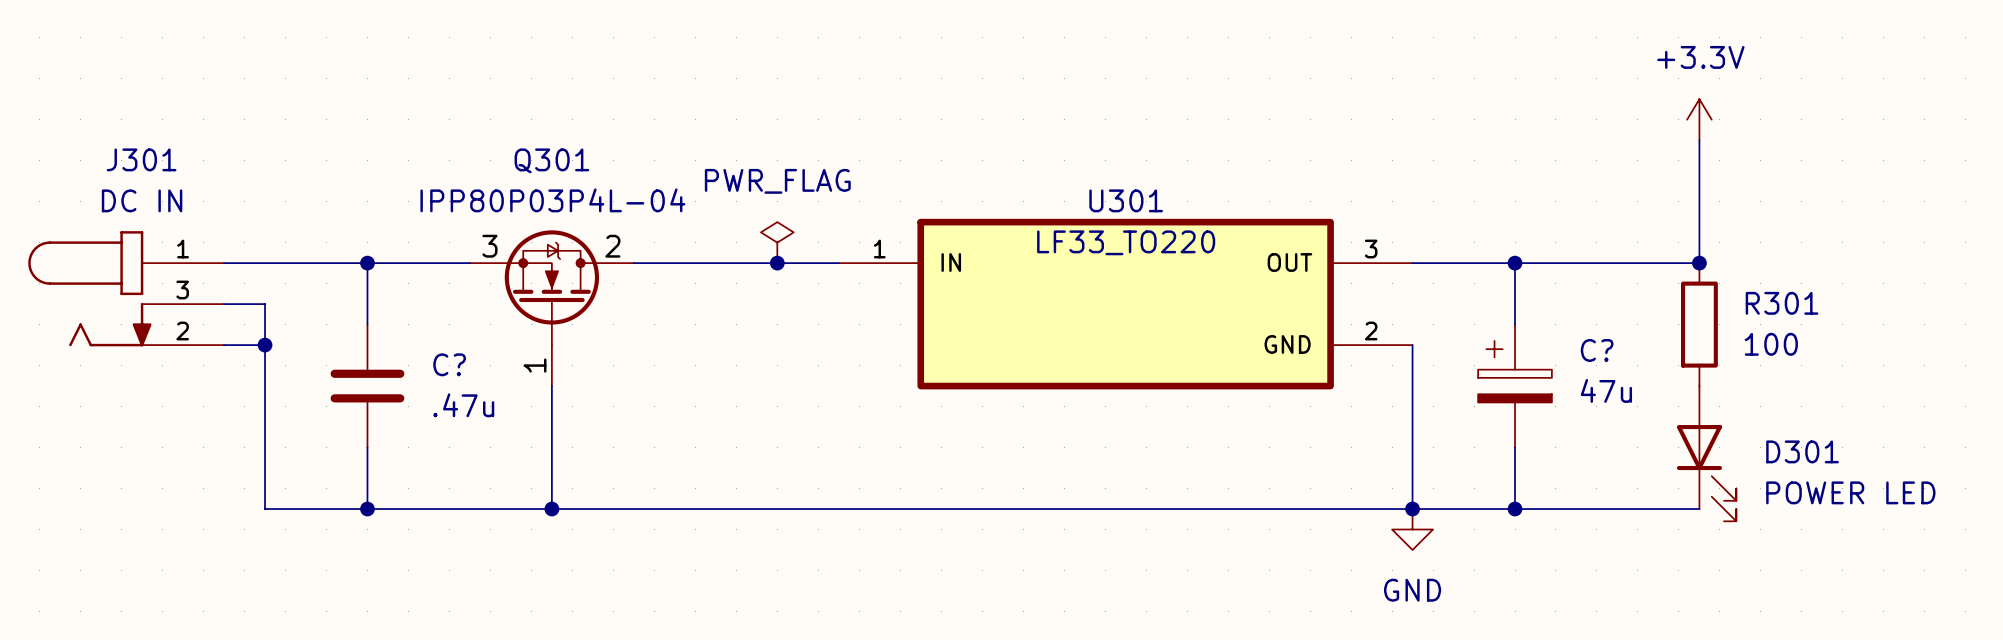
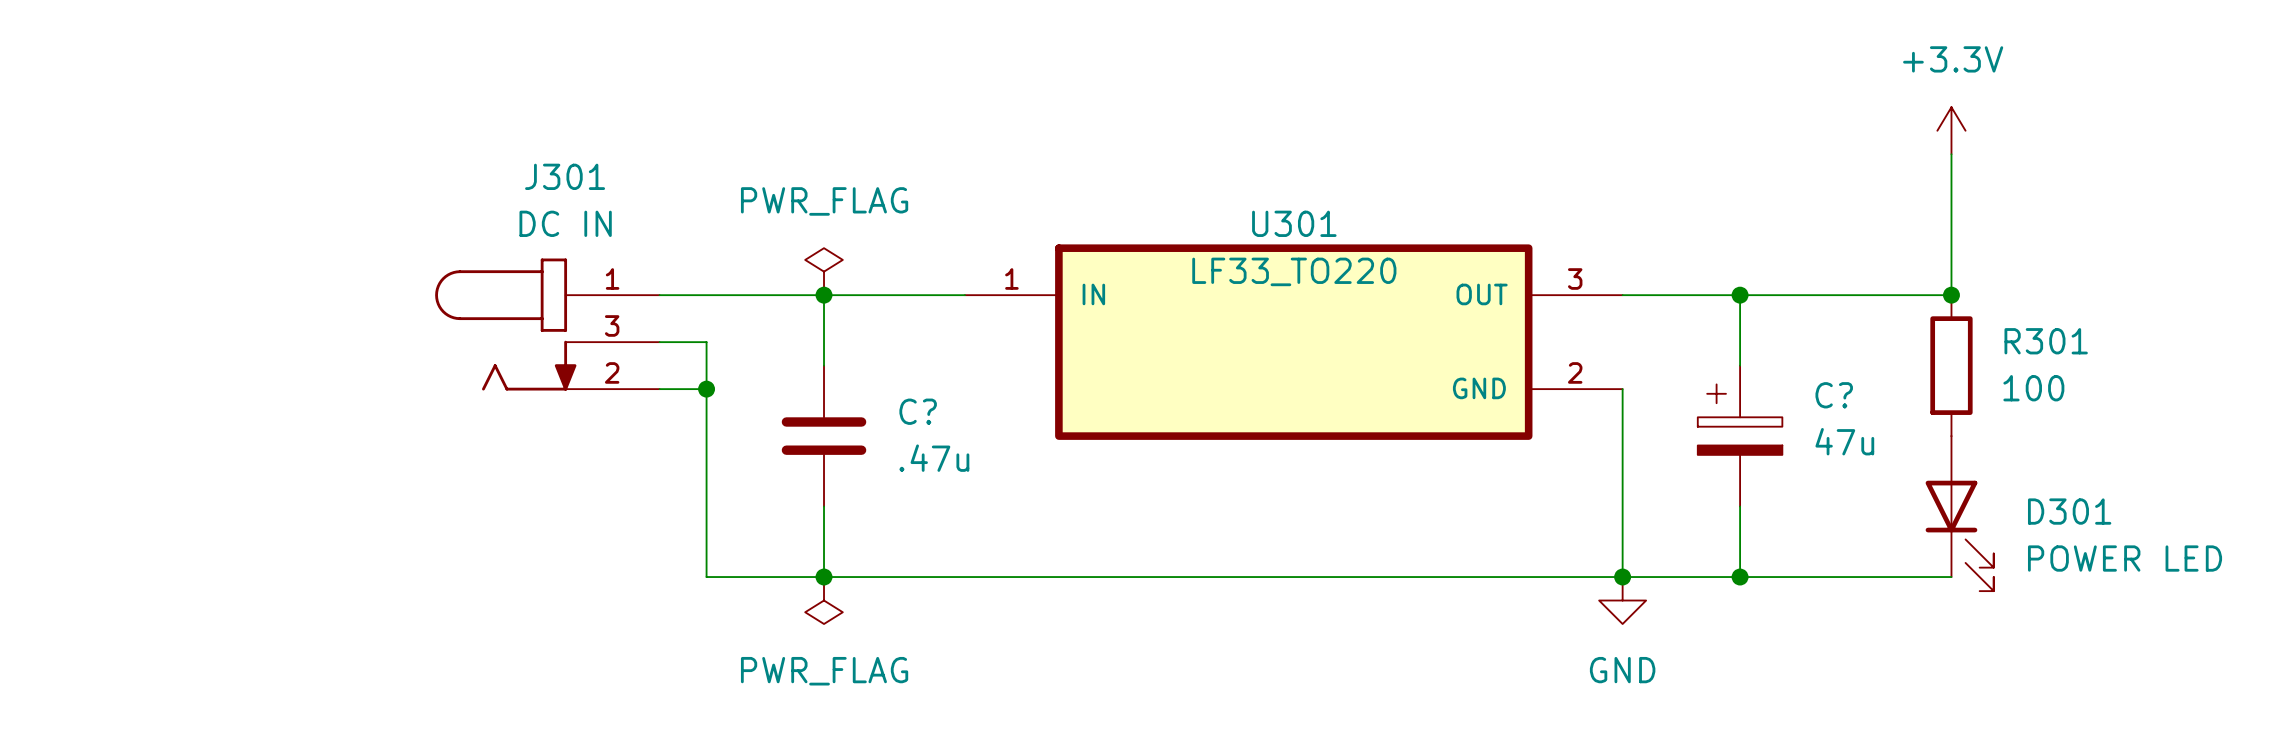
power symbol position: PWR_FLAG (777, 242) -> PWR_FLAG (824, 271)
wire: (224, 263) (469, 263) -> none
wire: (367, 263) (367, 324) -> (824, 295) (824, 365)
junction: (367, 263) -> none
junction position: (777, 263) -> (824, 295)
J301 position: (126, 288) -> (547, 324)
wire: (224, 304) (265, 304) (265, 509) (613, 509) -> (659, 342) (706, 342) (706, 577)
Q301: IPP80P03P4L-04 (551, 308) -> none
wire: (224, 345) (265, 345) -> (659, 389) (706, 389)
junction: (265, 345) -> none
junction: none -> (706, 389)
C? position: (367, 386) -> (824, 436)
wire: (551, 386) (551, 509) -> none
wire: (367, 447) (367, 509) -> (824, 506) (824, 577)
junction: (367, 509) -> none
junction: (551, 509) -> none
junction: none -> (824, 577)
power symbol: none -> PWR_FLAG (824, 600)

